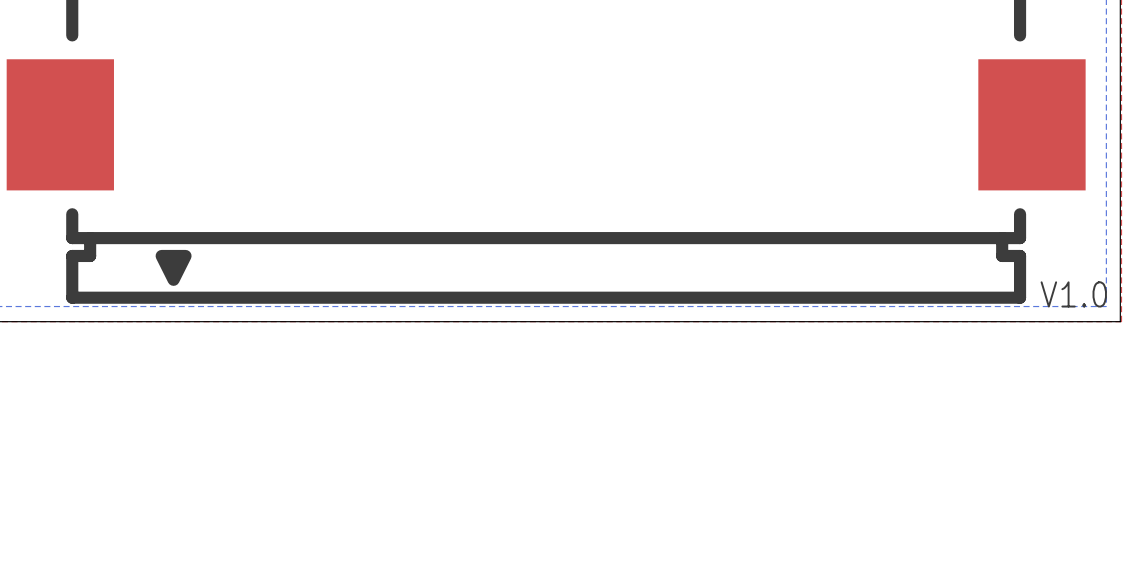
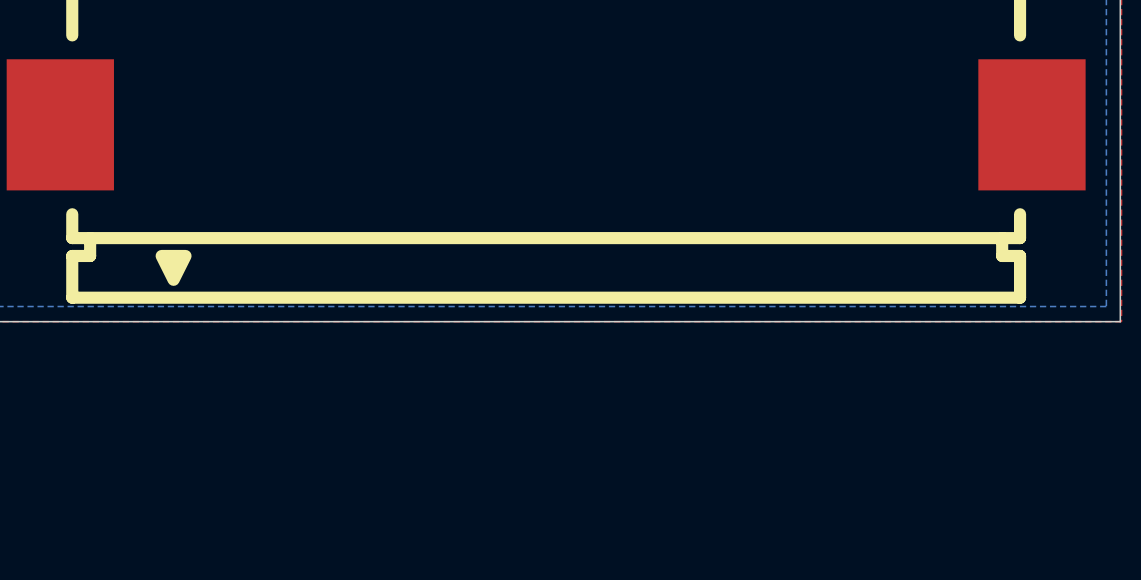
text: V1.0 (1073, 294) -> none

